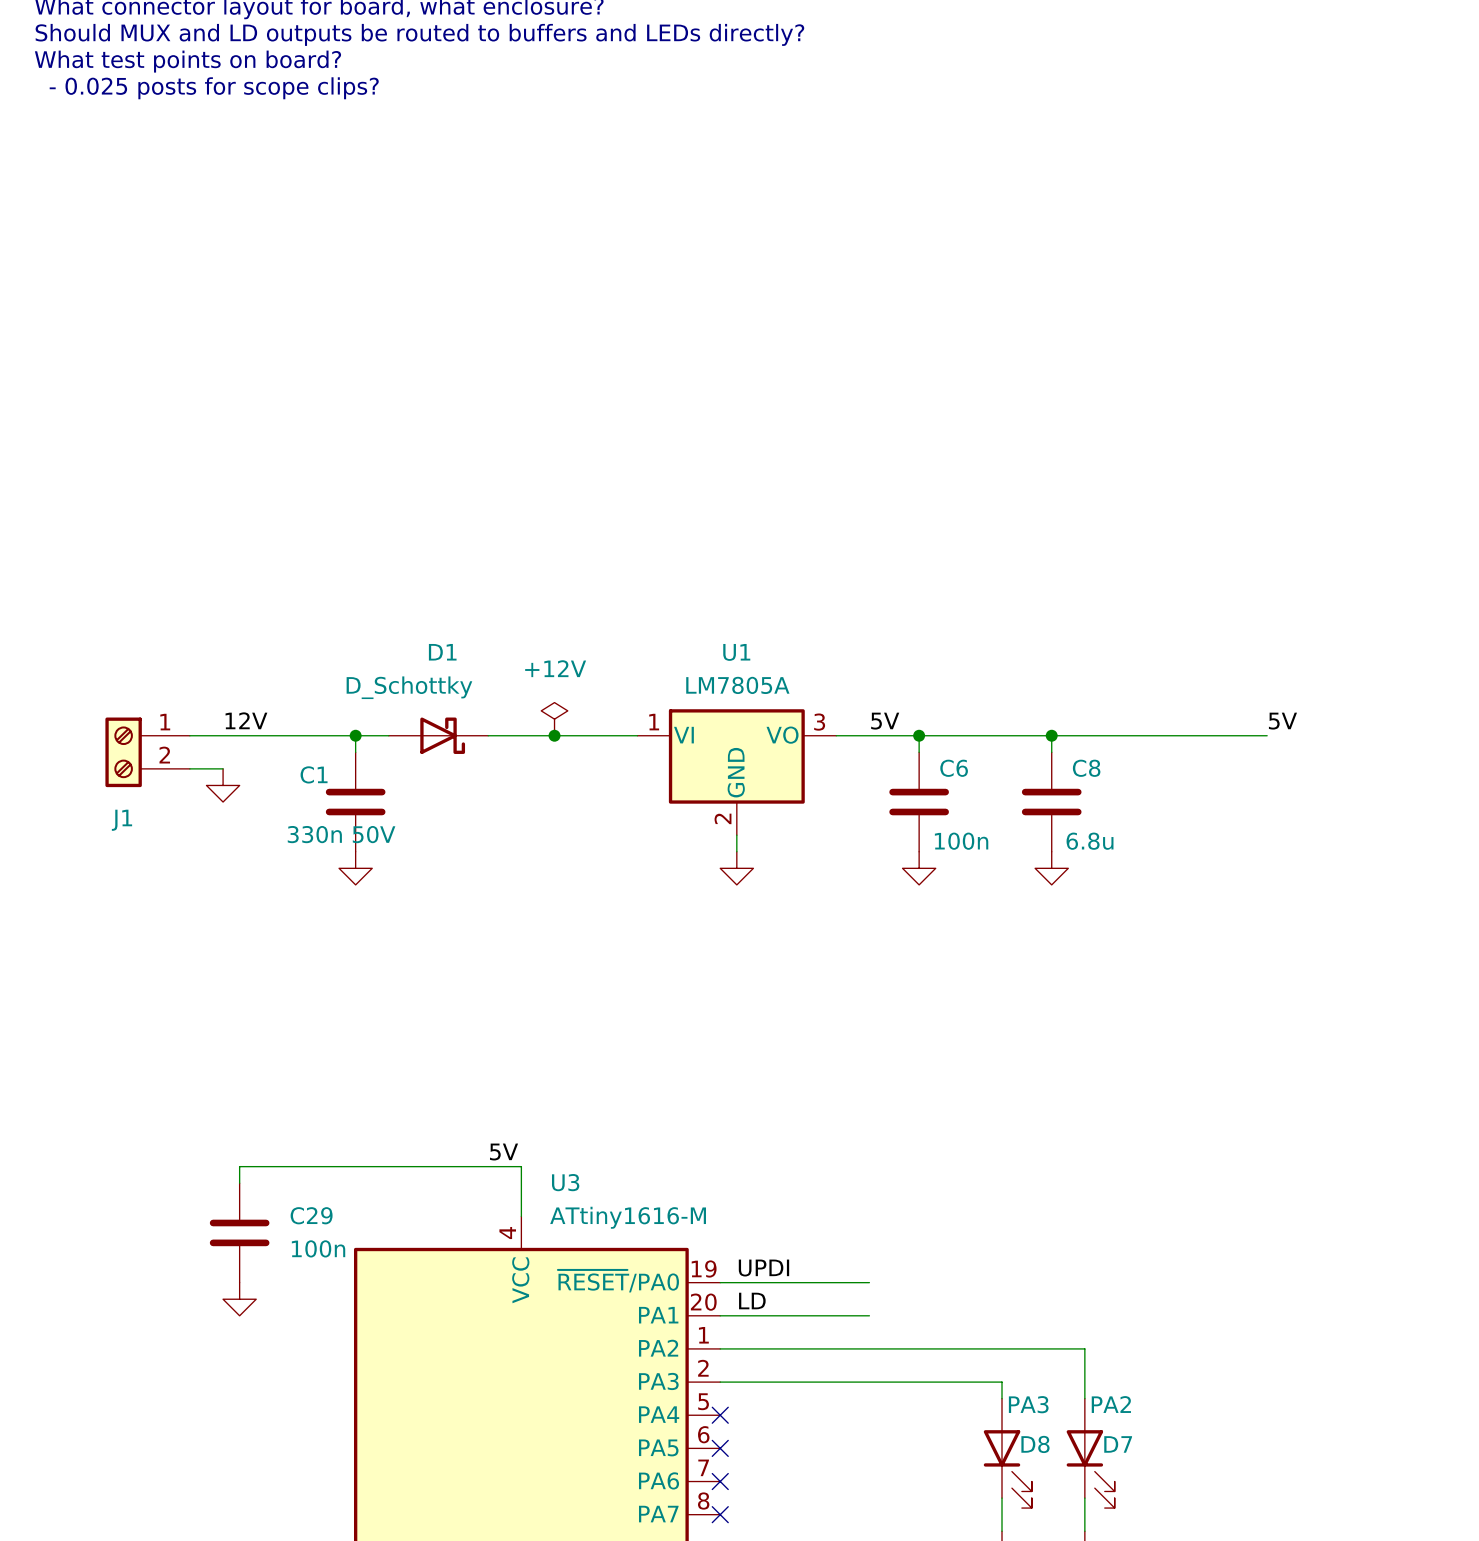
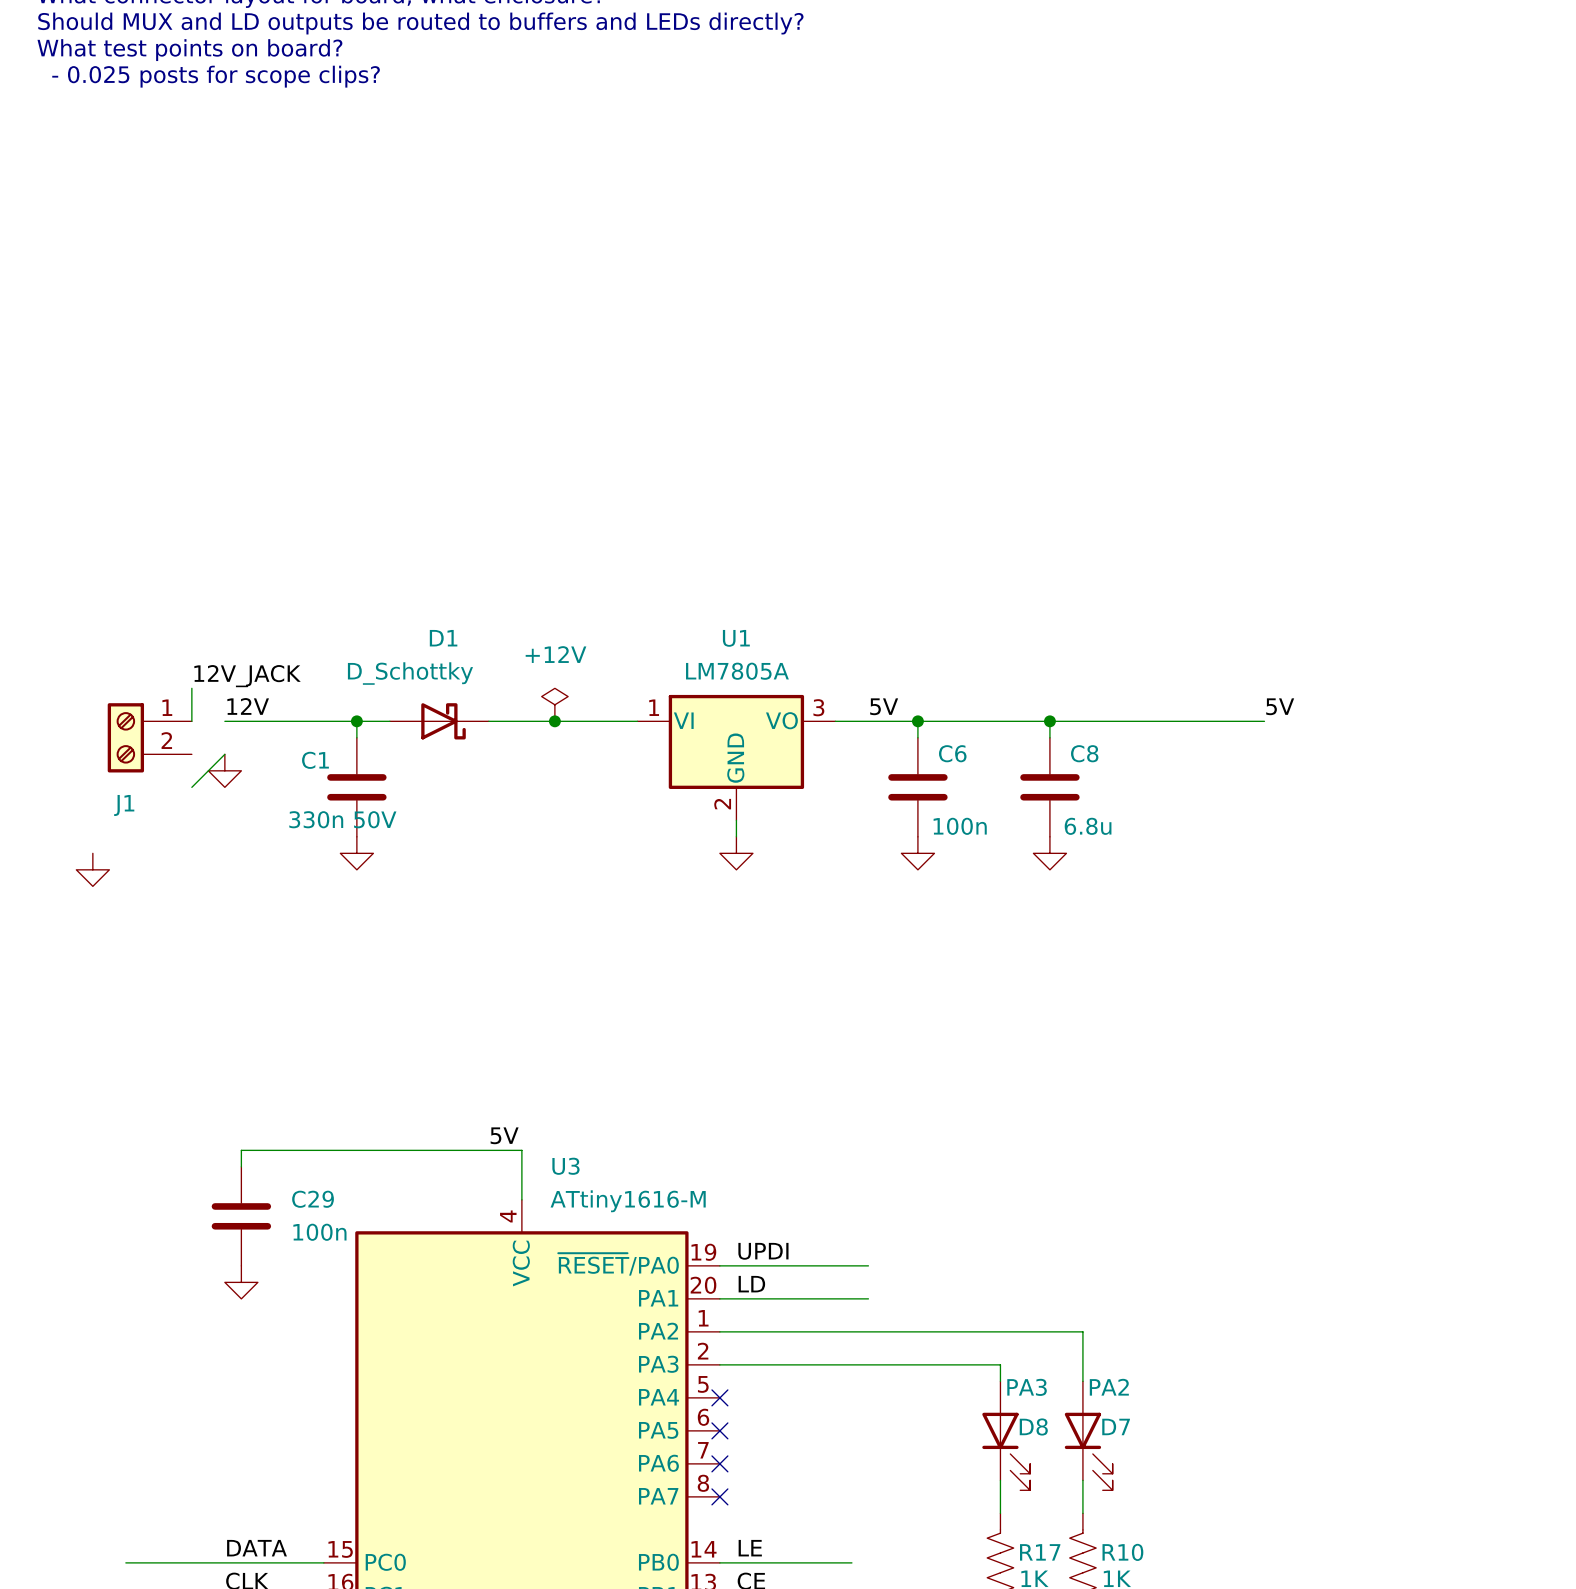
label: none -> 12V_JACK (247, 676)
wire: (189, 735) (223, 735) -> (191, 721) (191, 688)
wire: (189, 768) (223, 768) -> (191, 787) (224, 754)
power symbol: none -> (92, 869)

